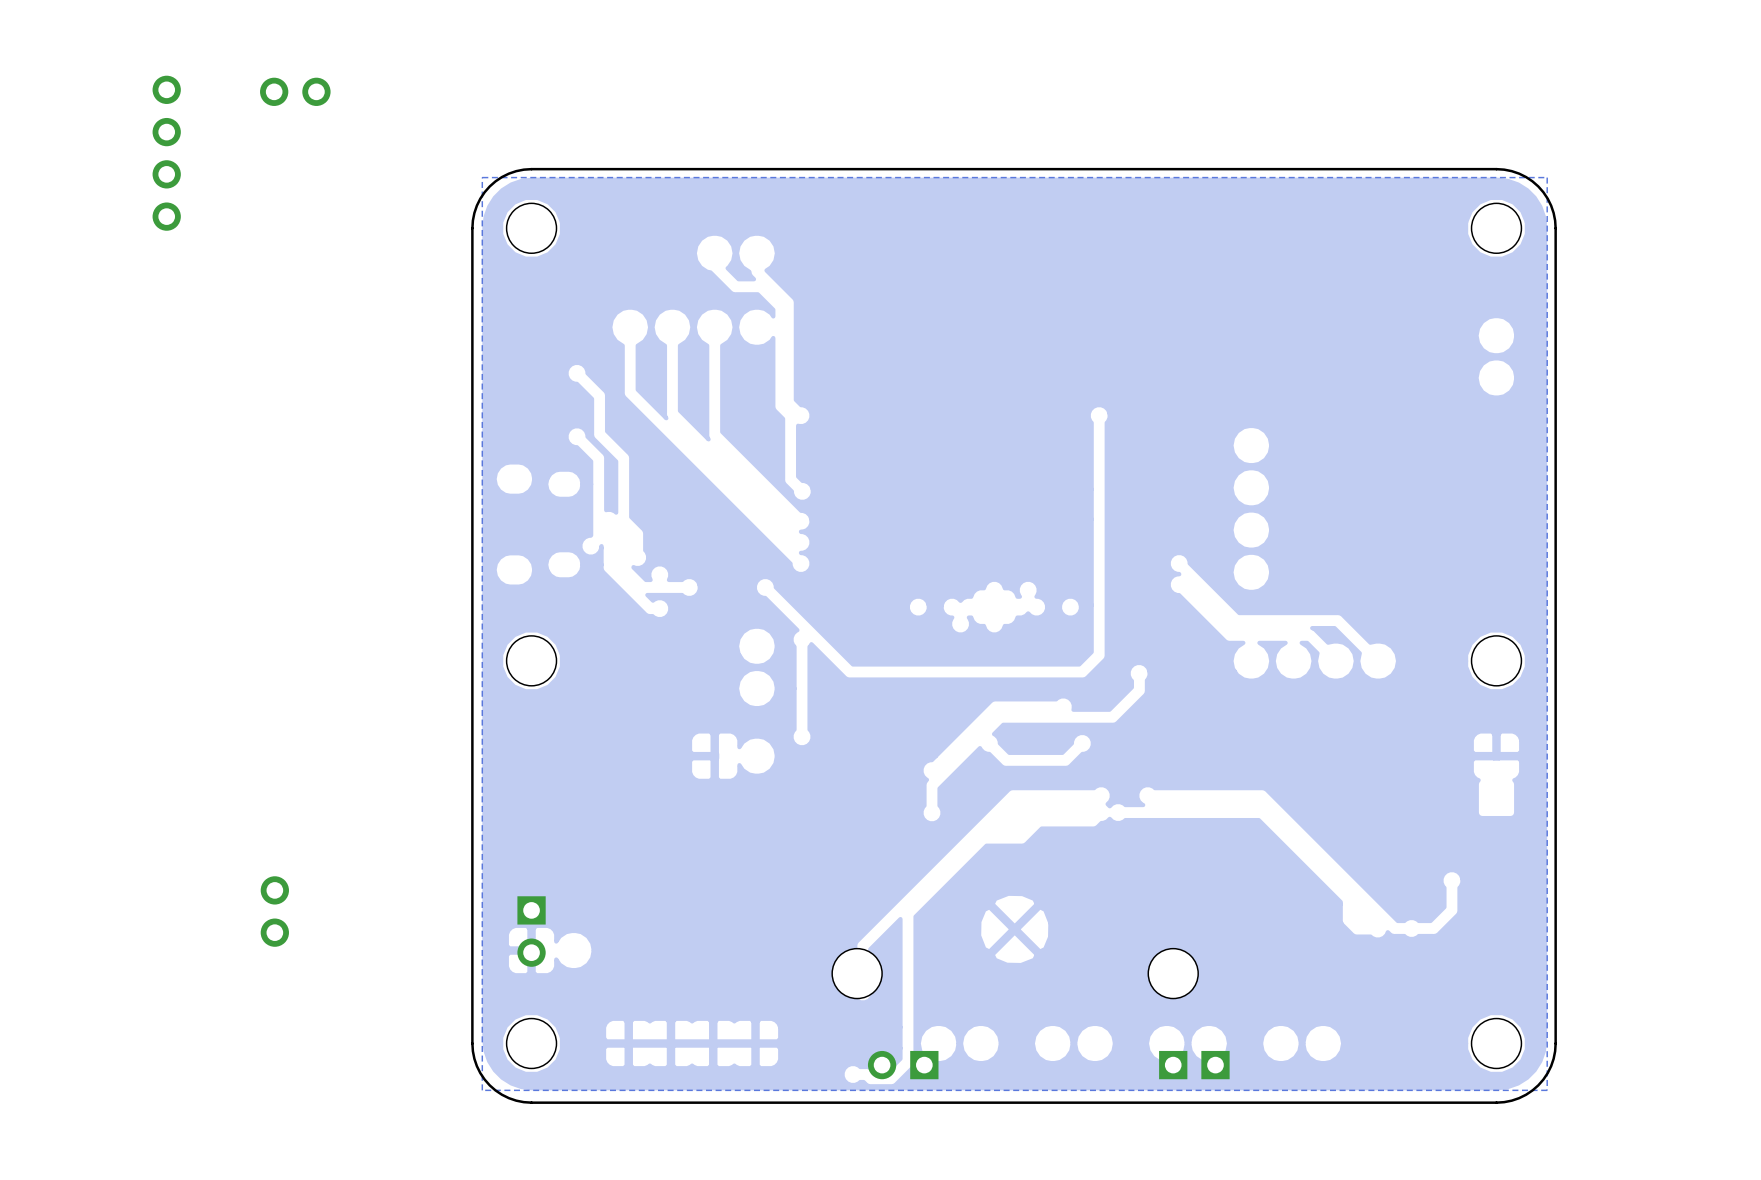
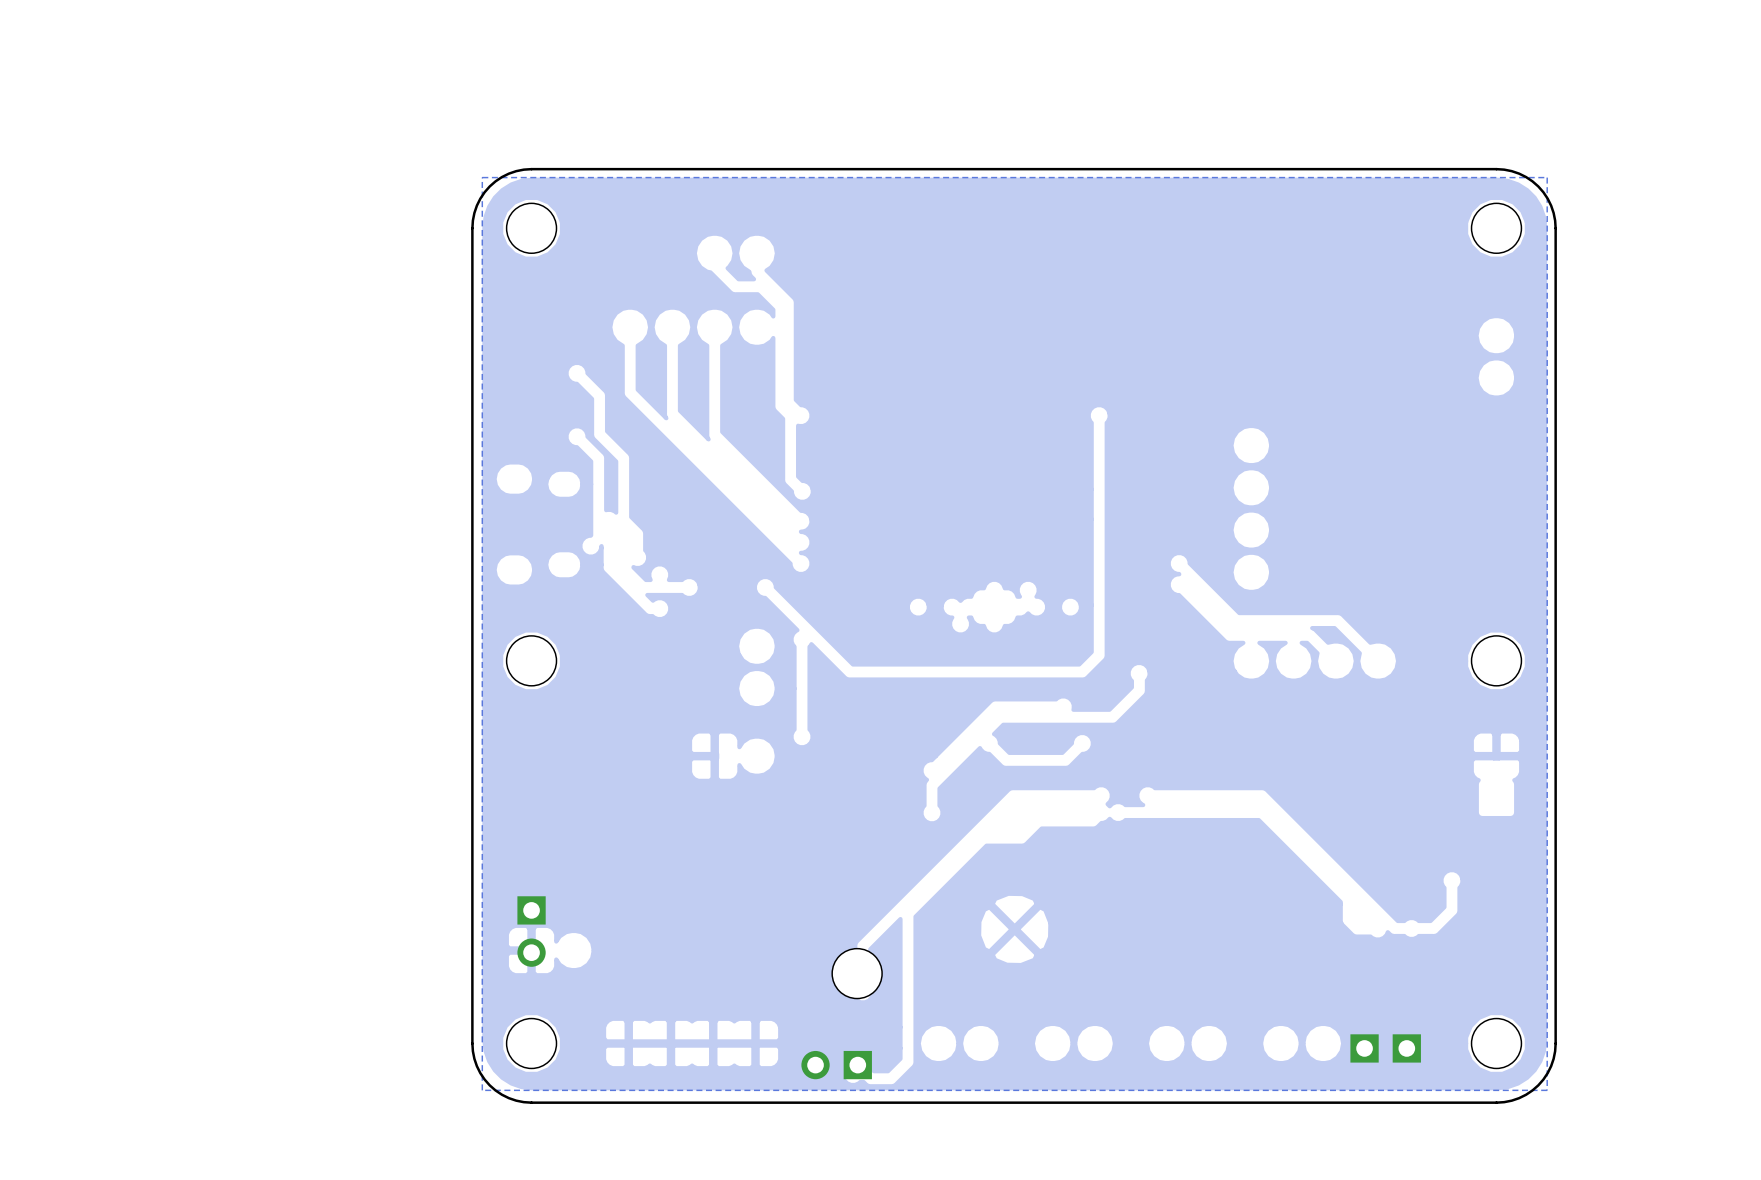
part: (295, 91) -> none
part: (166, 153) -> none
part: (274, 911) -> none
part: (1173, 973) -> none
part position: (903, 1065) -> (836, 1065)
part position: (1194, 1065) -> (1385, 1048)

